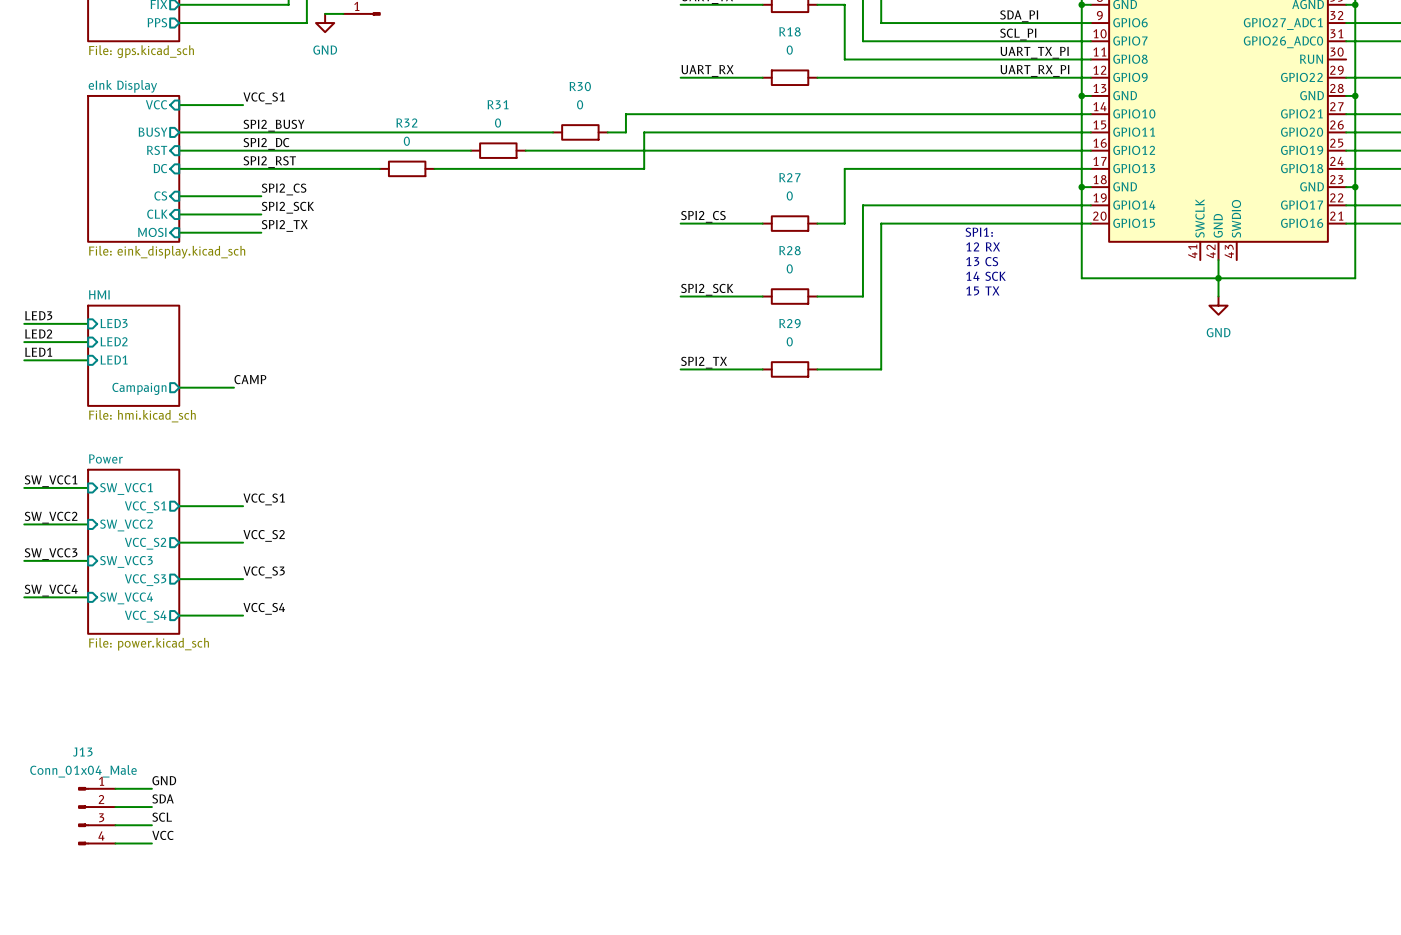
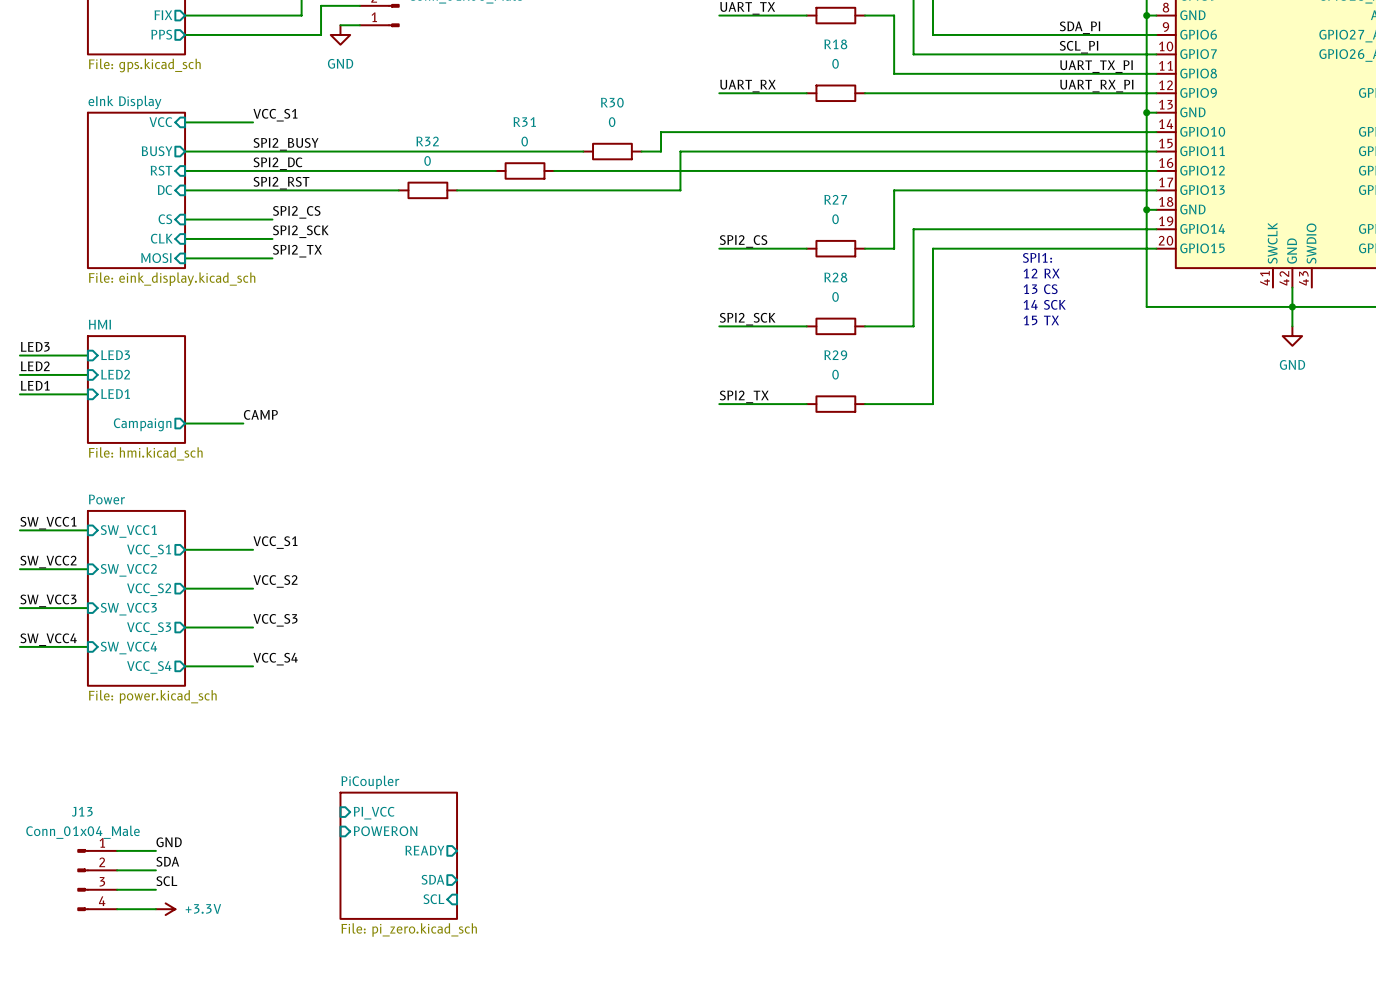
sheet pin: none -> PI_VCC (374, 813)
sheet pin: none -> POWERON (385, 831)
sheet pin: none -> READY (424, 850)
sheet PiCoupler: none -> File: pi_zero.kicad_sch (398, 855)
sheet pin: none -> SDA (432, 879)
sheet pin: none -> SCL (433, 899)
label: VCC (162, 835) -> none
power symbol: none -> +3.3V (165, 909)

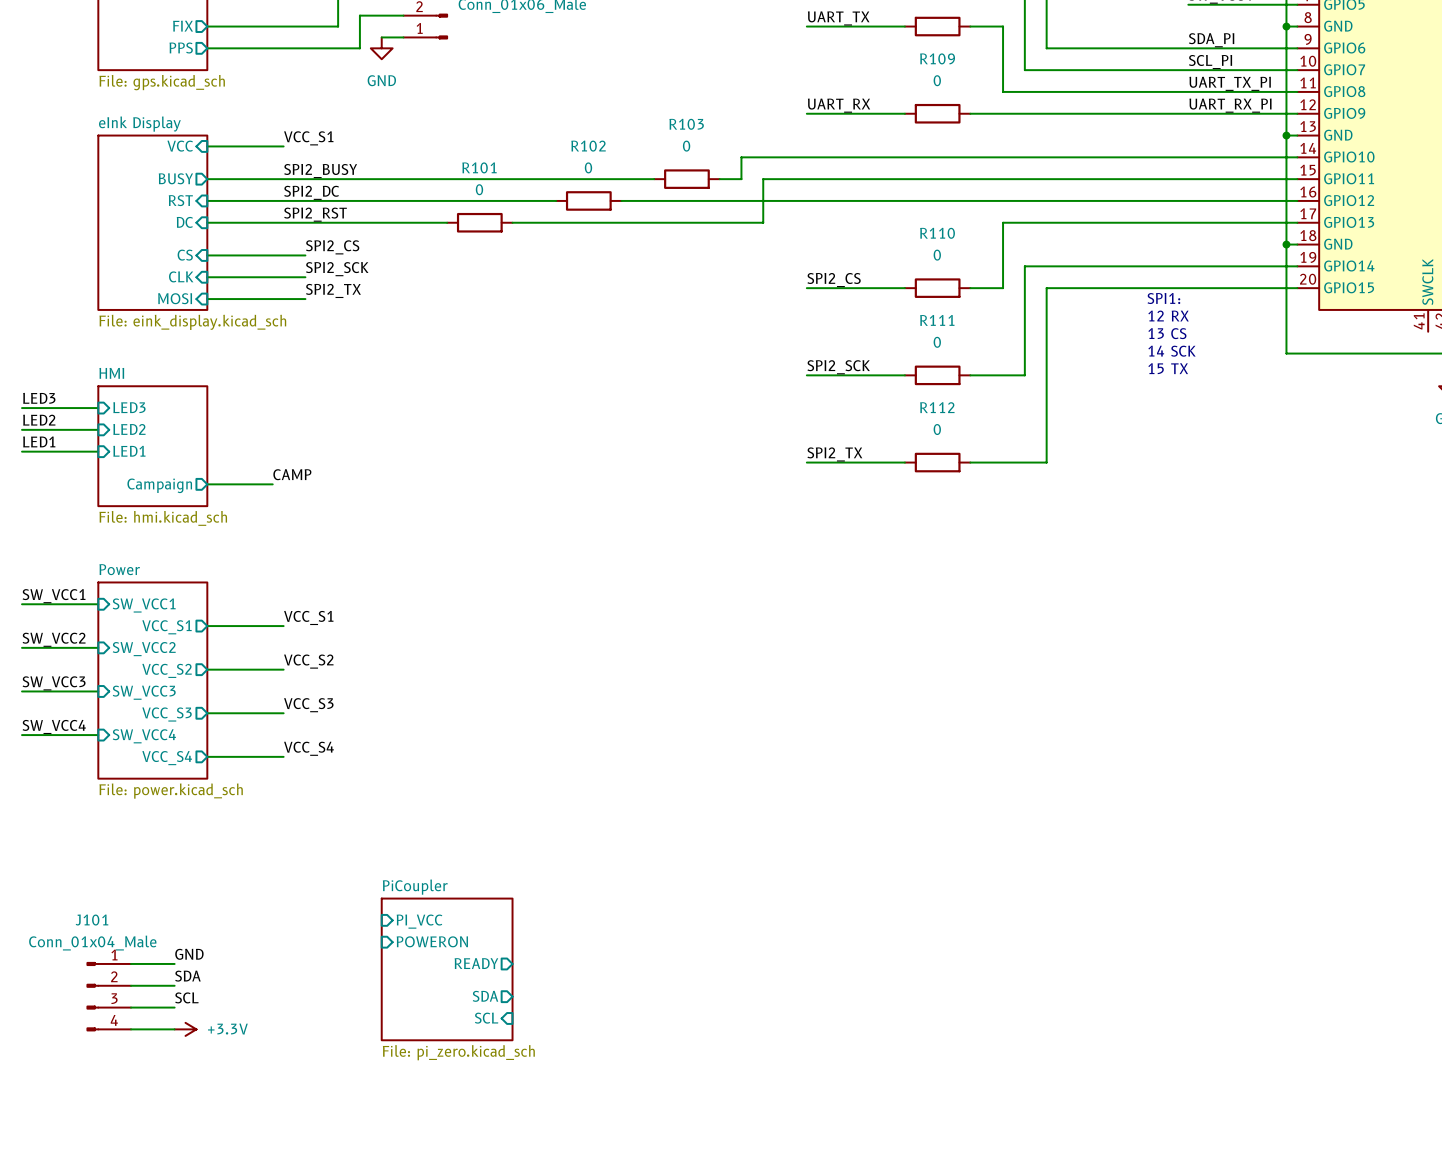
R18 name: R18 (835, 44) -> R109 (937, 58)
R30 name: R30 (612, 102) -> R103 (686, 124)
R31 name: R31 (524, 122) -> R102 (588, 146)
R32 name: R32 (427, 141) -> R101 (479, 167)
R27 name: R27 (835, 199) -> R110 (937, 233)
R28 name: R28 (835, 277) -> R111 (937, 320)
R29 name: R29 (835, 355) -> R112 (937, 407)
J13 name: J13 (82, 811) -> J101 (91, 920)

